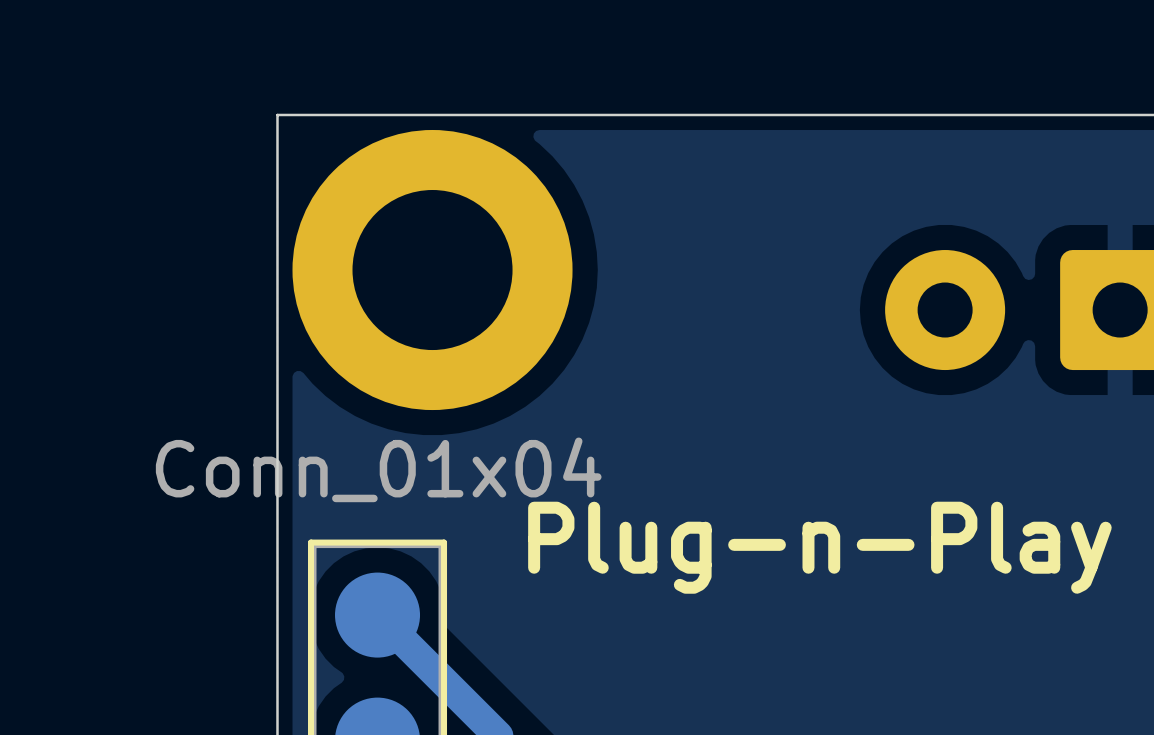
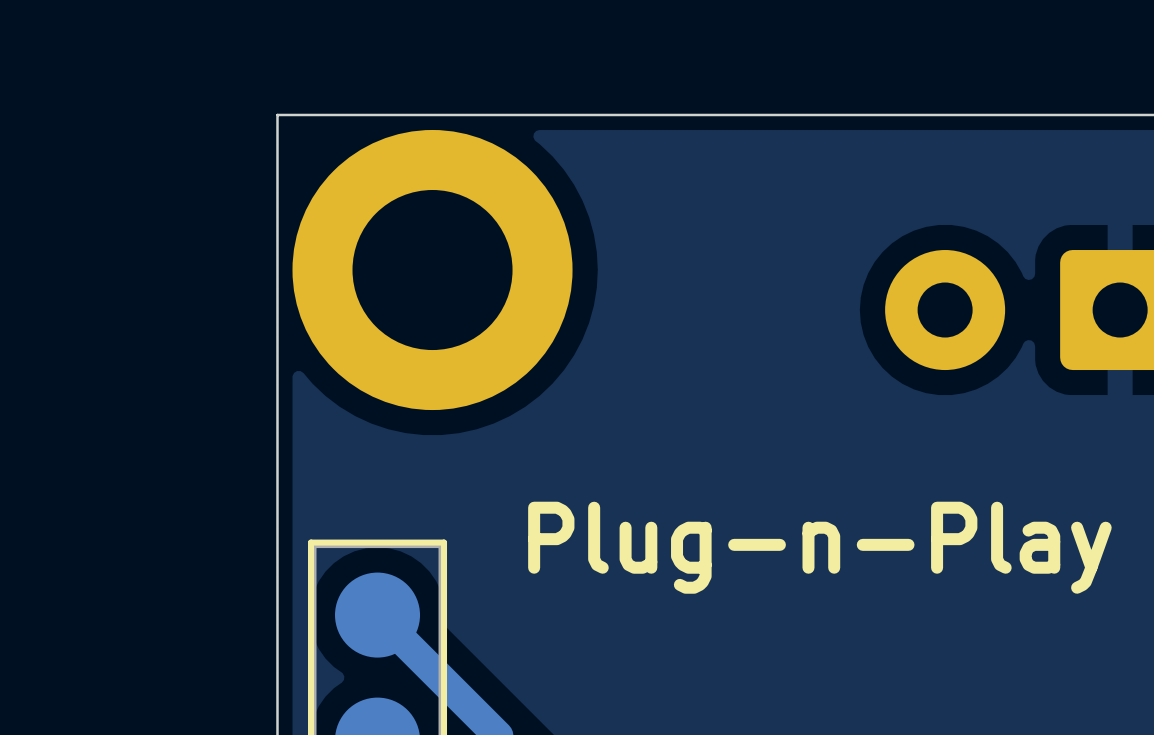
part value: Conn_01x04 (378, 469) -> none

